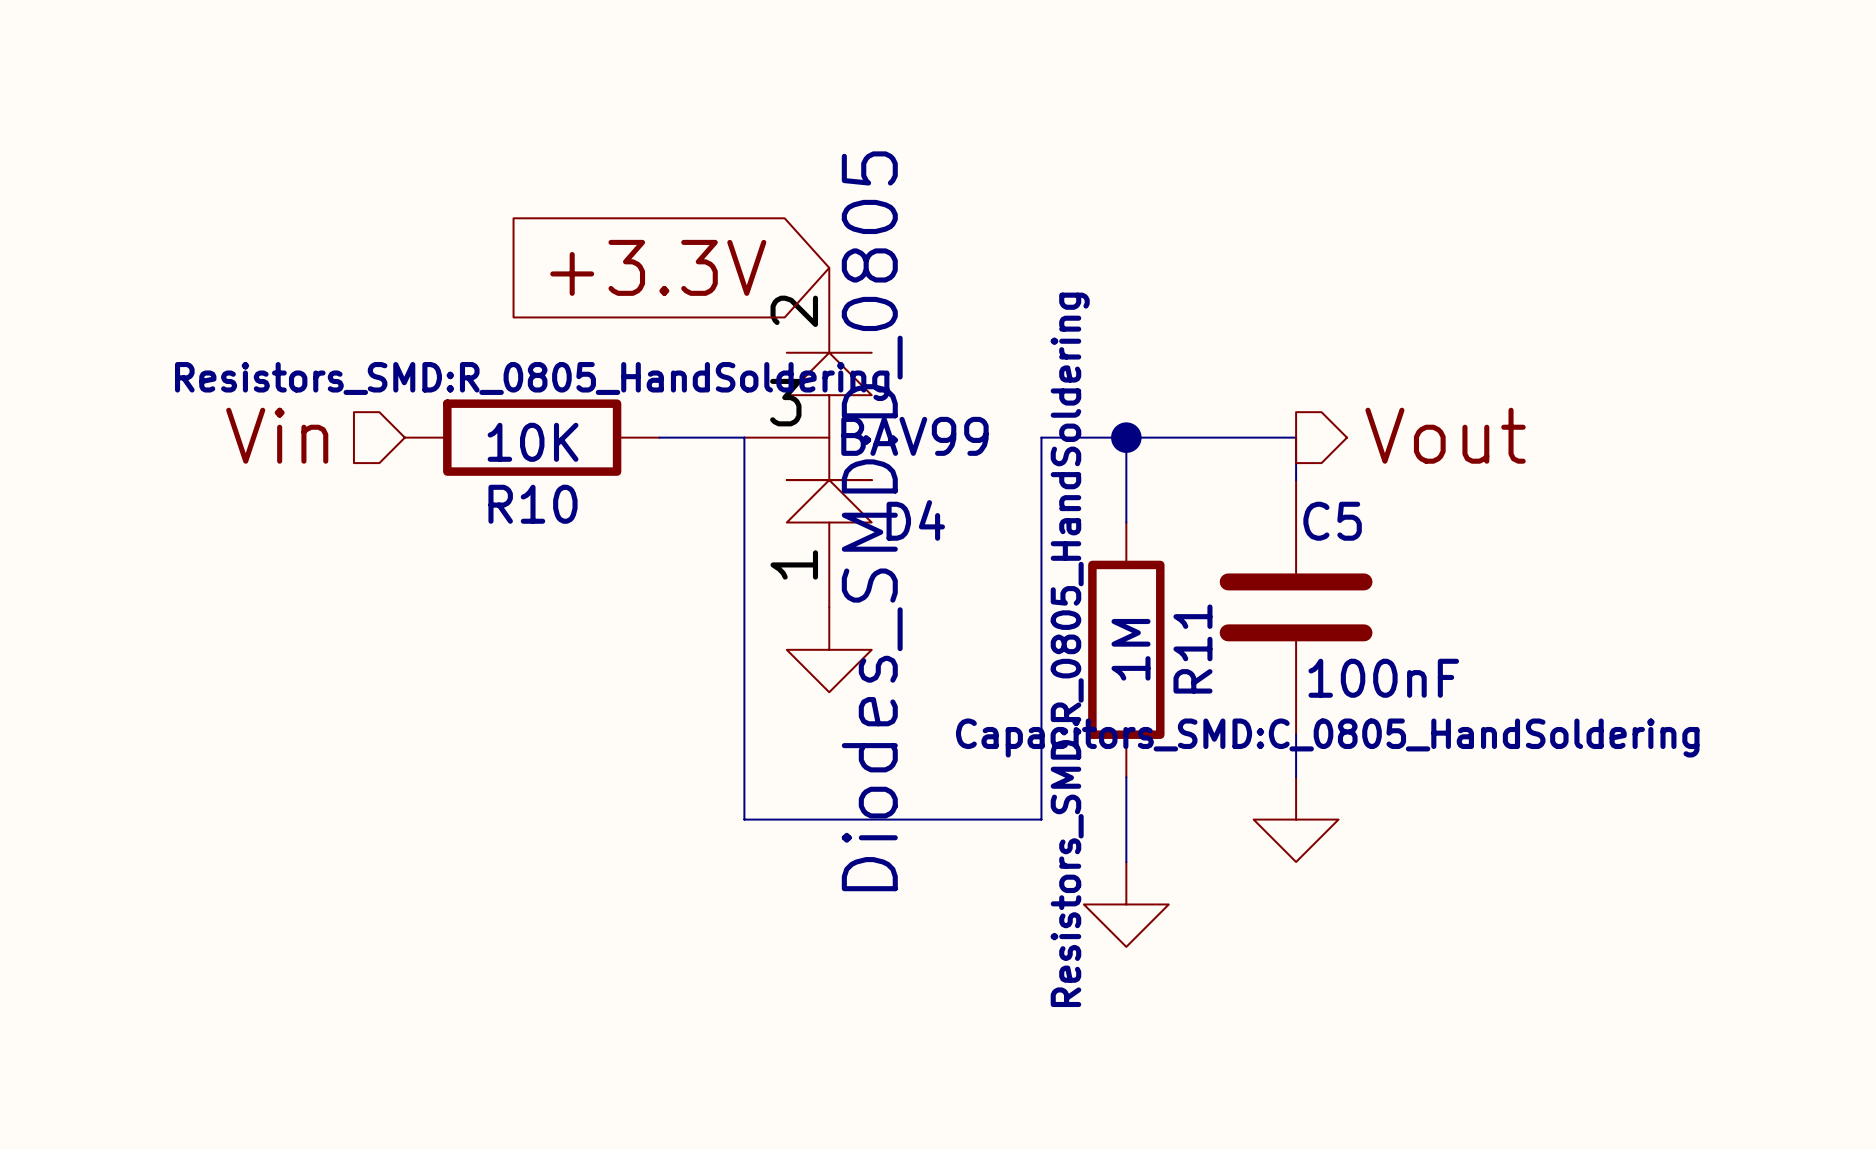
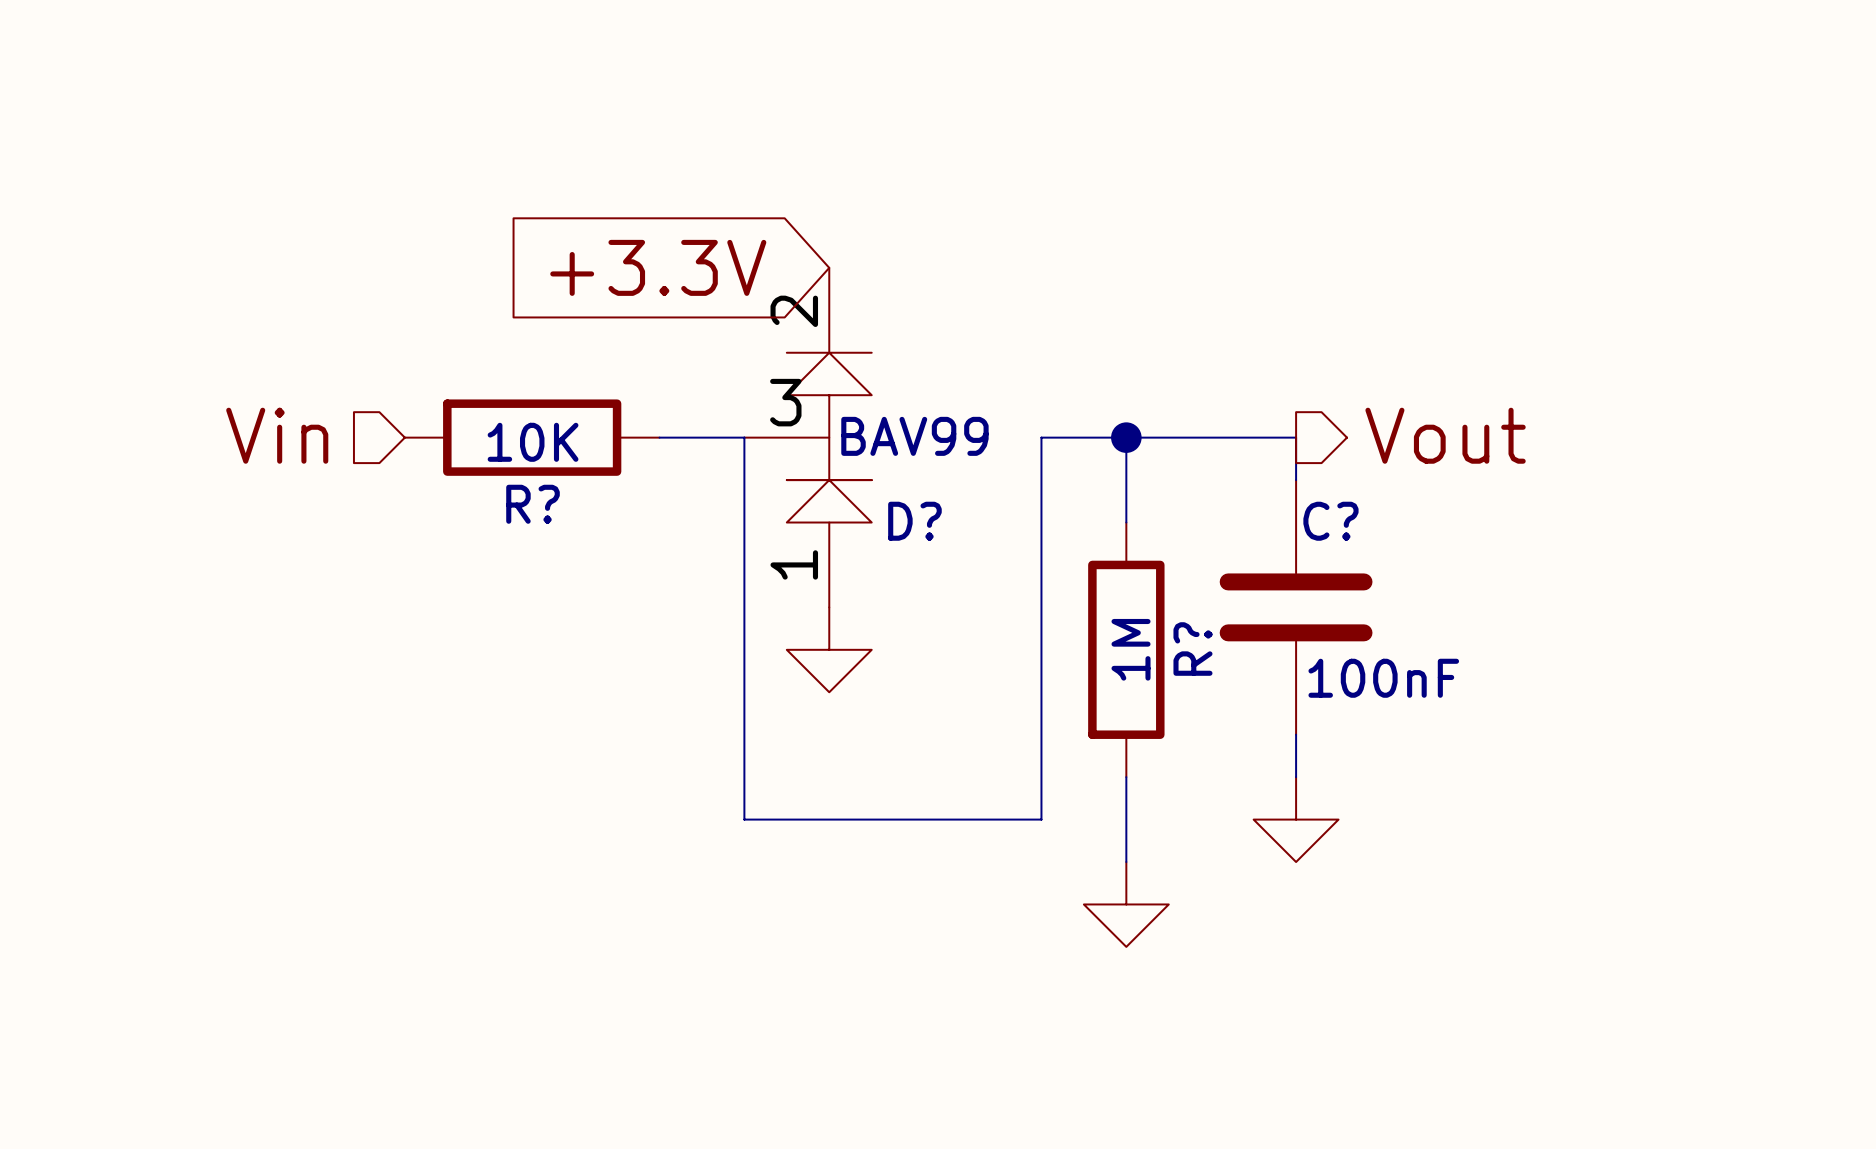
R10 text: Resistors_SMD:R_0805_HandSoldering (532, 381) -> none
R10 name: R10 (533, 504) -> R? (533, 504)
D4 name: D4 (915, 520) -> D? (914, 521)
D4 text: Diodes_SMD:D_0805 (872, 521) -> none
C5 name: C5 (1332, 521) -> C? (1330, 521)
R11 text: Resistors_SMD:R_0805_HandSoldering (1070, 649) -> none
R11 name: R11 (1192, 649) -> R? (1192, 649)
C5 text: Capacitors_SMD:C_0805_HandSoldering (1327, 737) -> none

